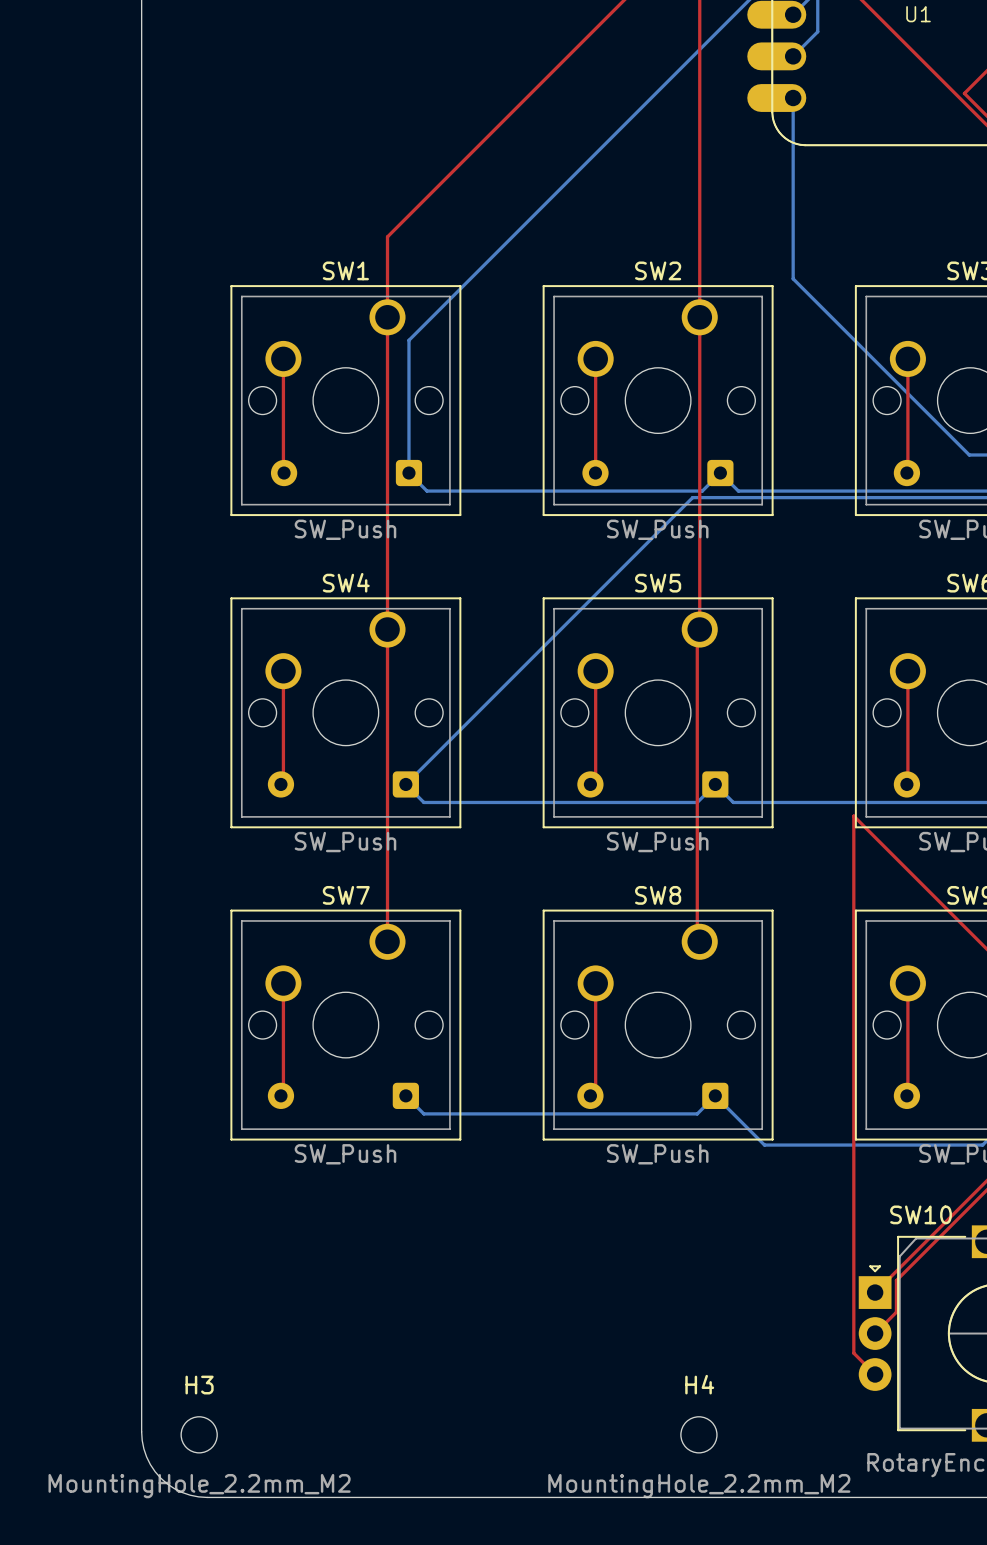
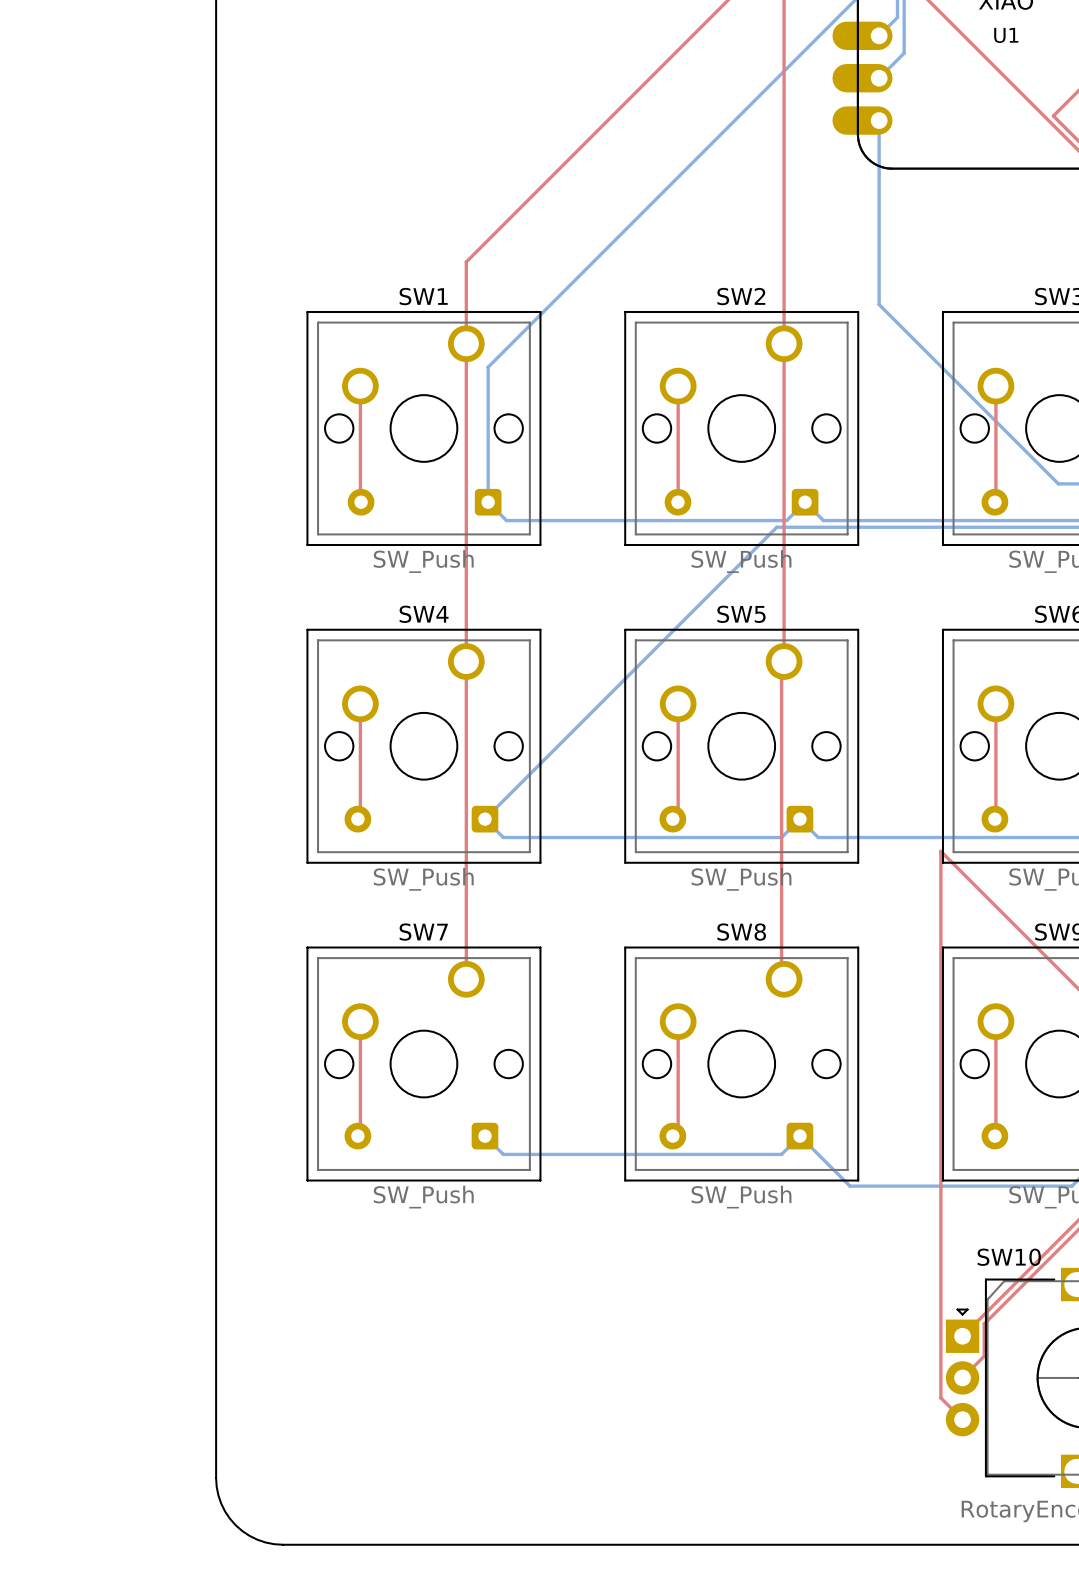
H3: MountingHole_2.2mm_M2 (199, 1434) -> none
H4: MountingHole_2.2mm_M2 (698, 1434) -> none

